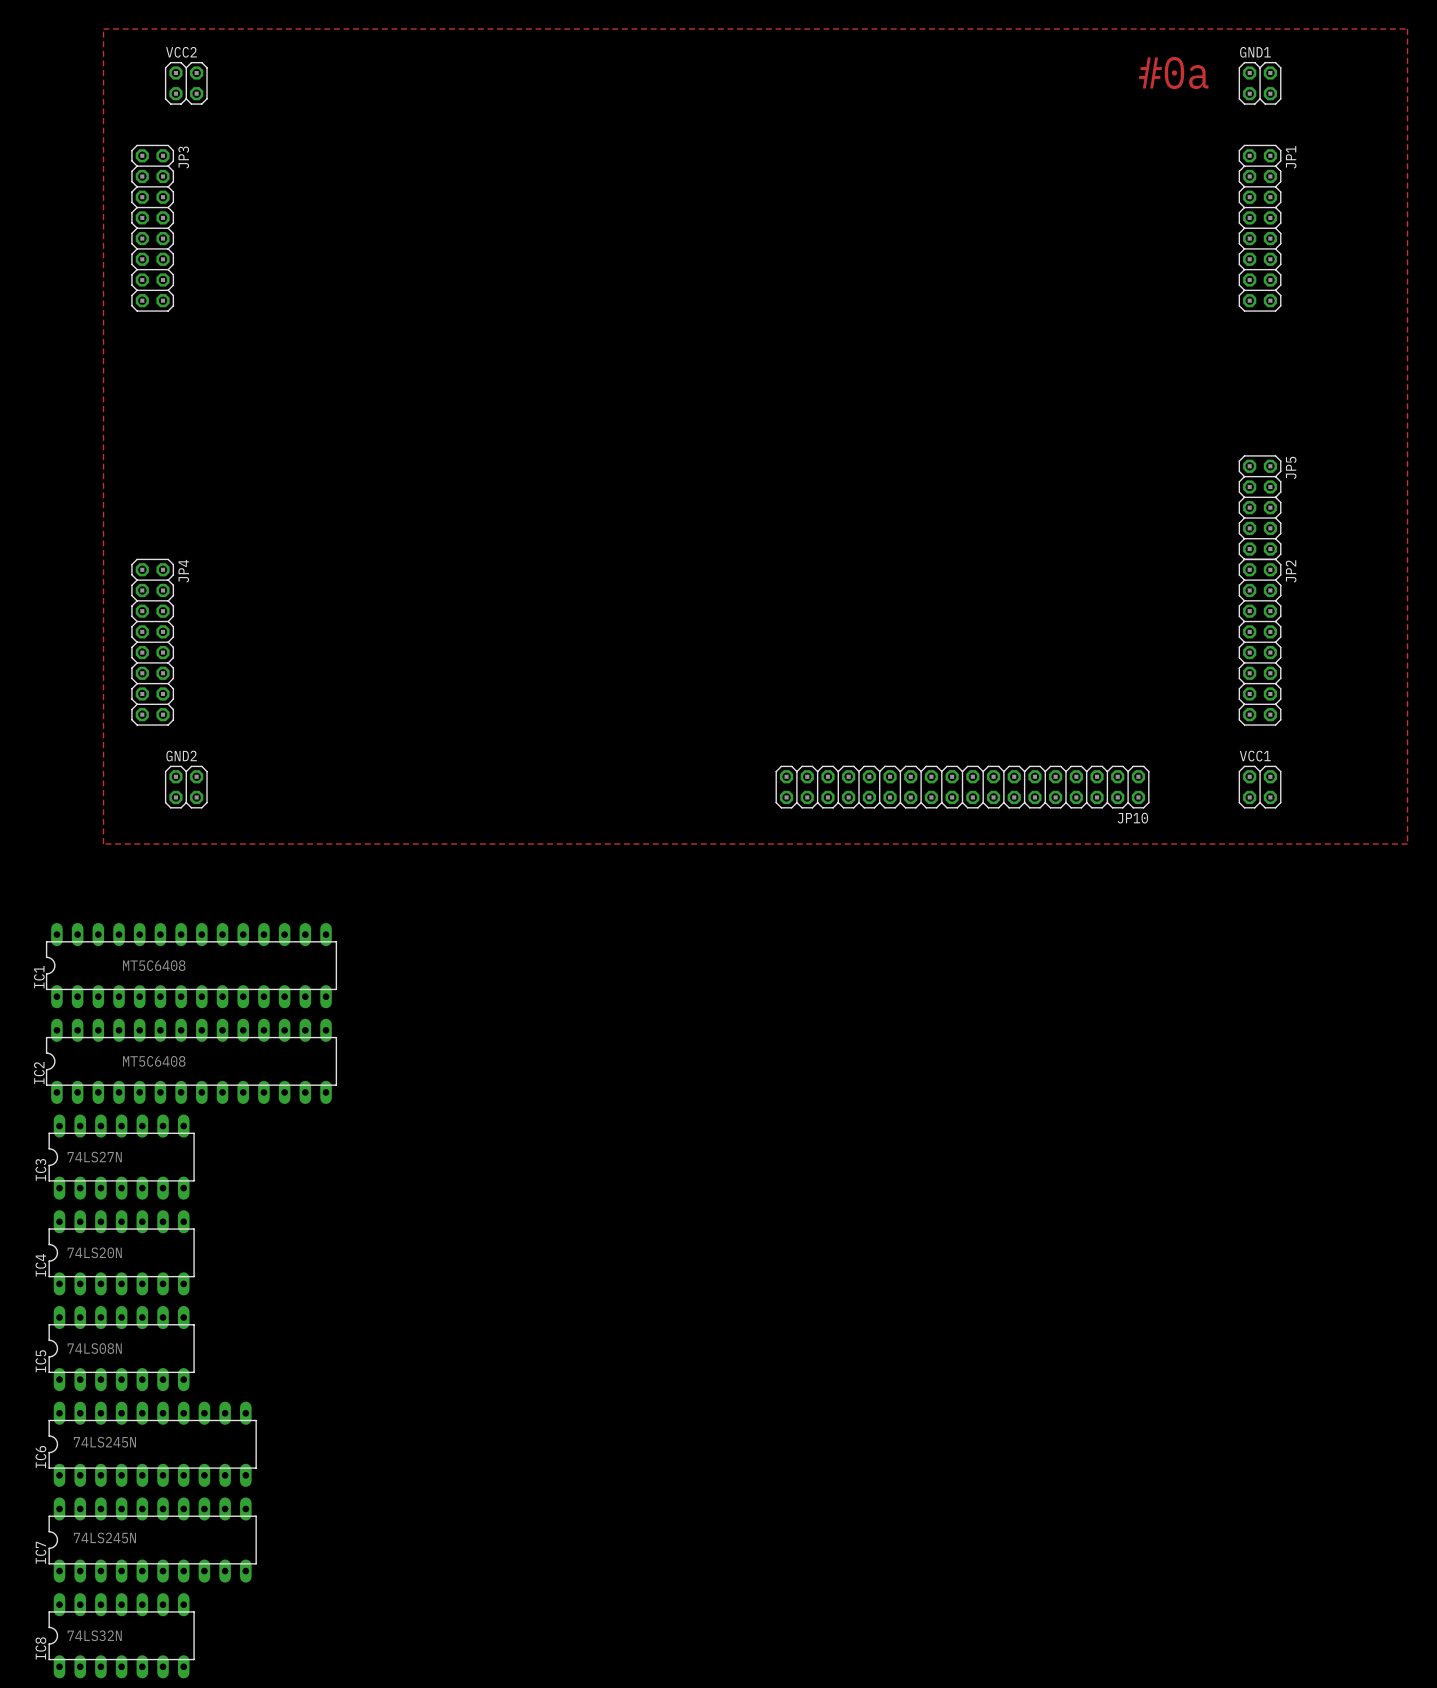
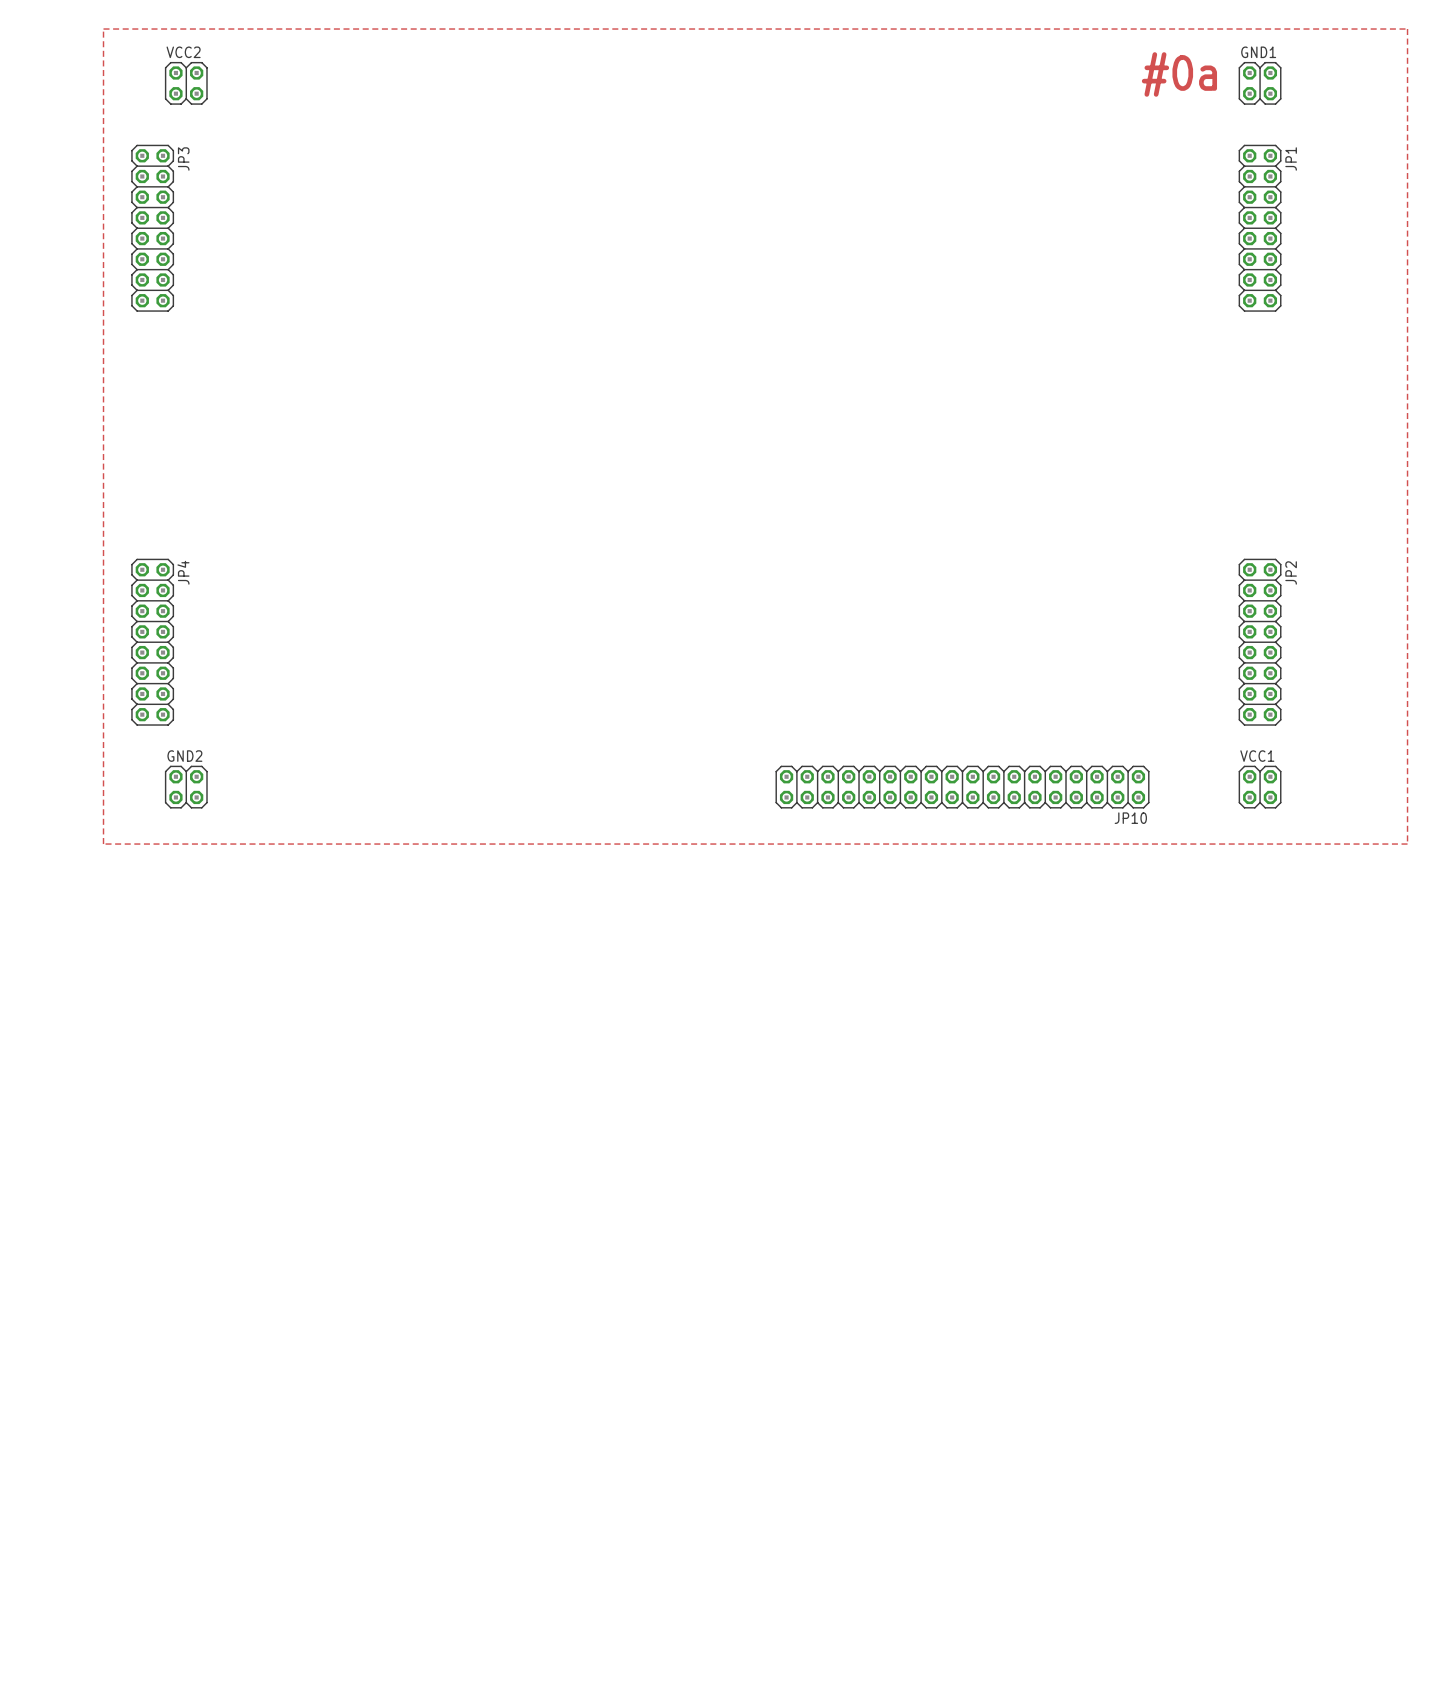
JP5: (1260, 507) -> none
IC1: MT5C6408 (191, 965) -> none
IC2: MT5C6408 (191, 1061) -> none
IC3: 74LS27N (121, 1157) -> none
IC4: 74LS20N (121, 1252) -> none
IC5: 74LS08N (121, 1348) -> none
IC6: 74LS245N (152, 1444) -> none
IC7: 74LS245N (152, 1540) -> none
IC8: 74LS32N (121, 1635) -> none

